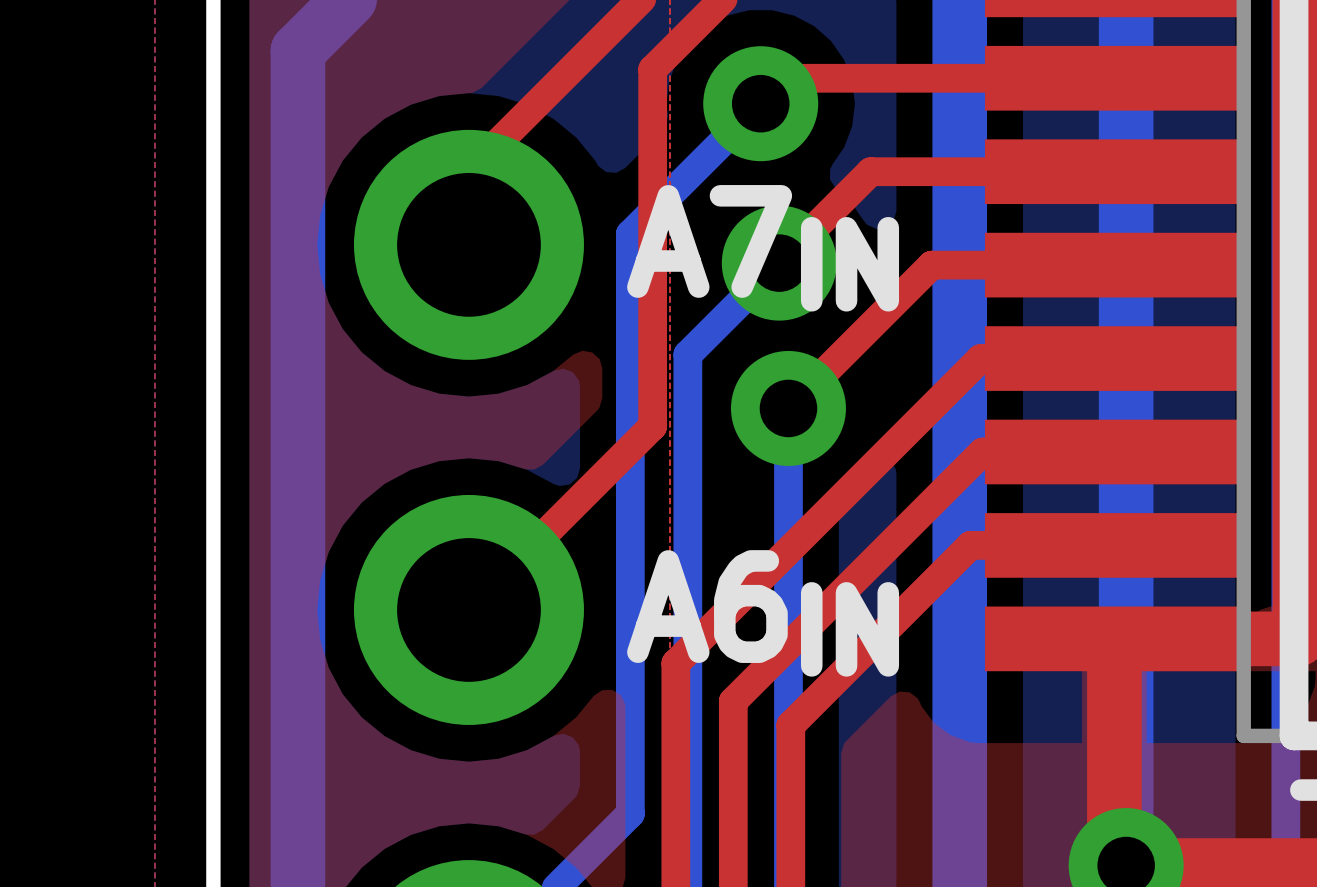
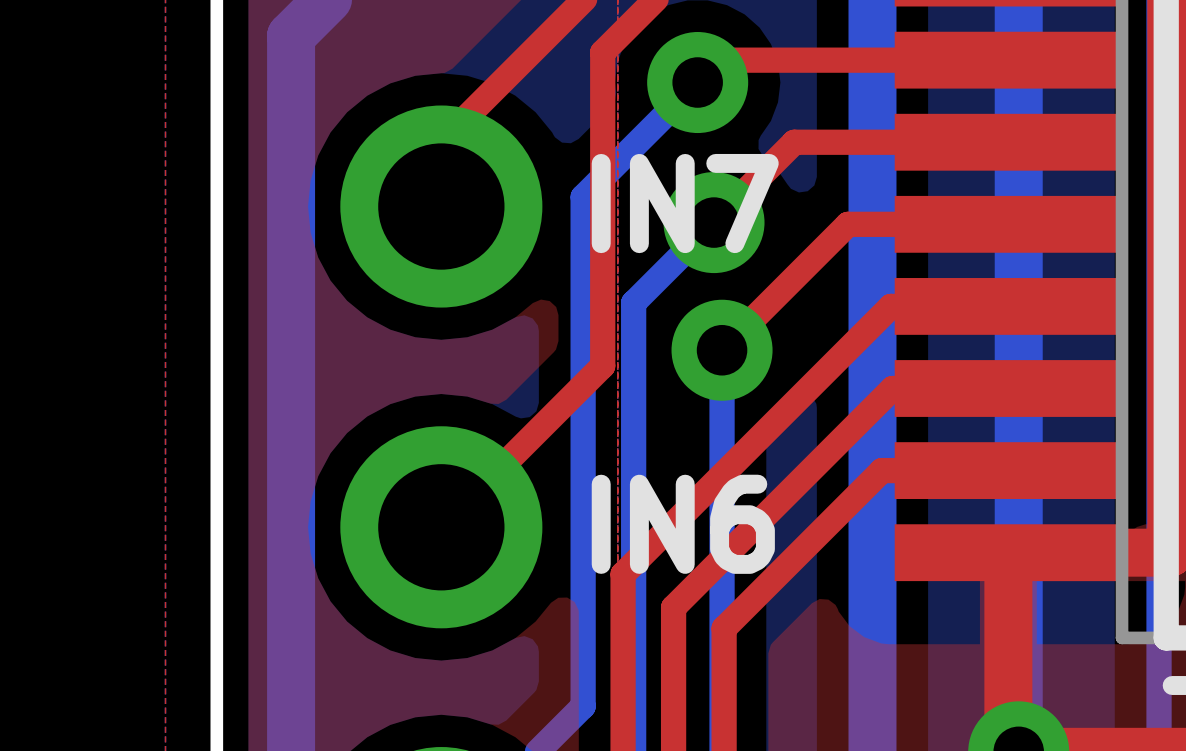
text: A7IN (763, 248) -> IN7 (685, 203)
text: A6IN (763, 613) -> IN6 (683, 524)

